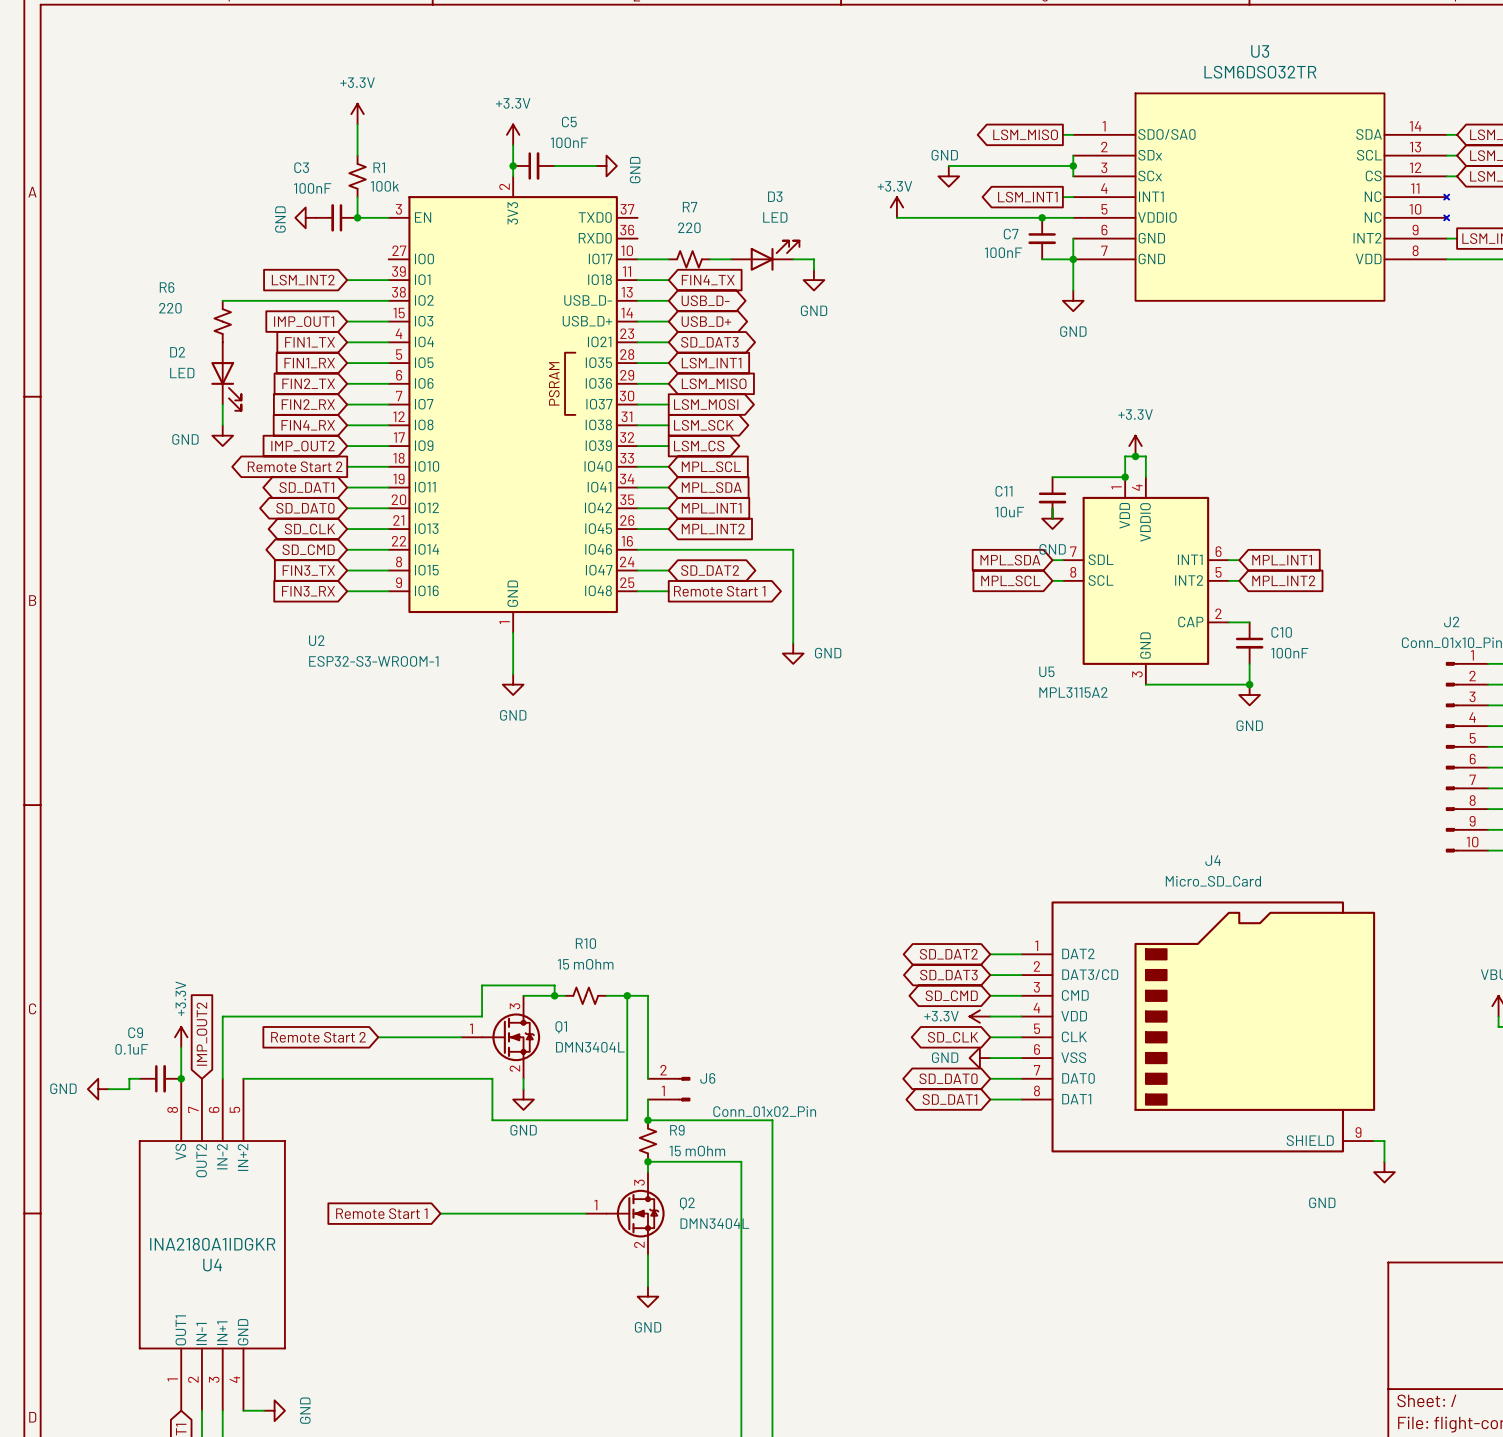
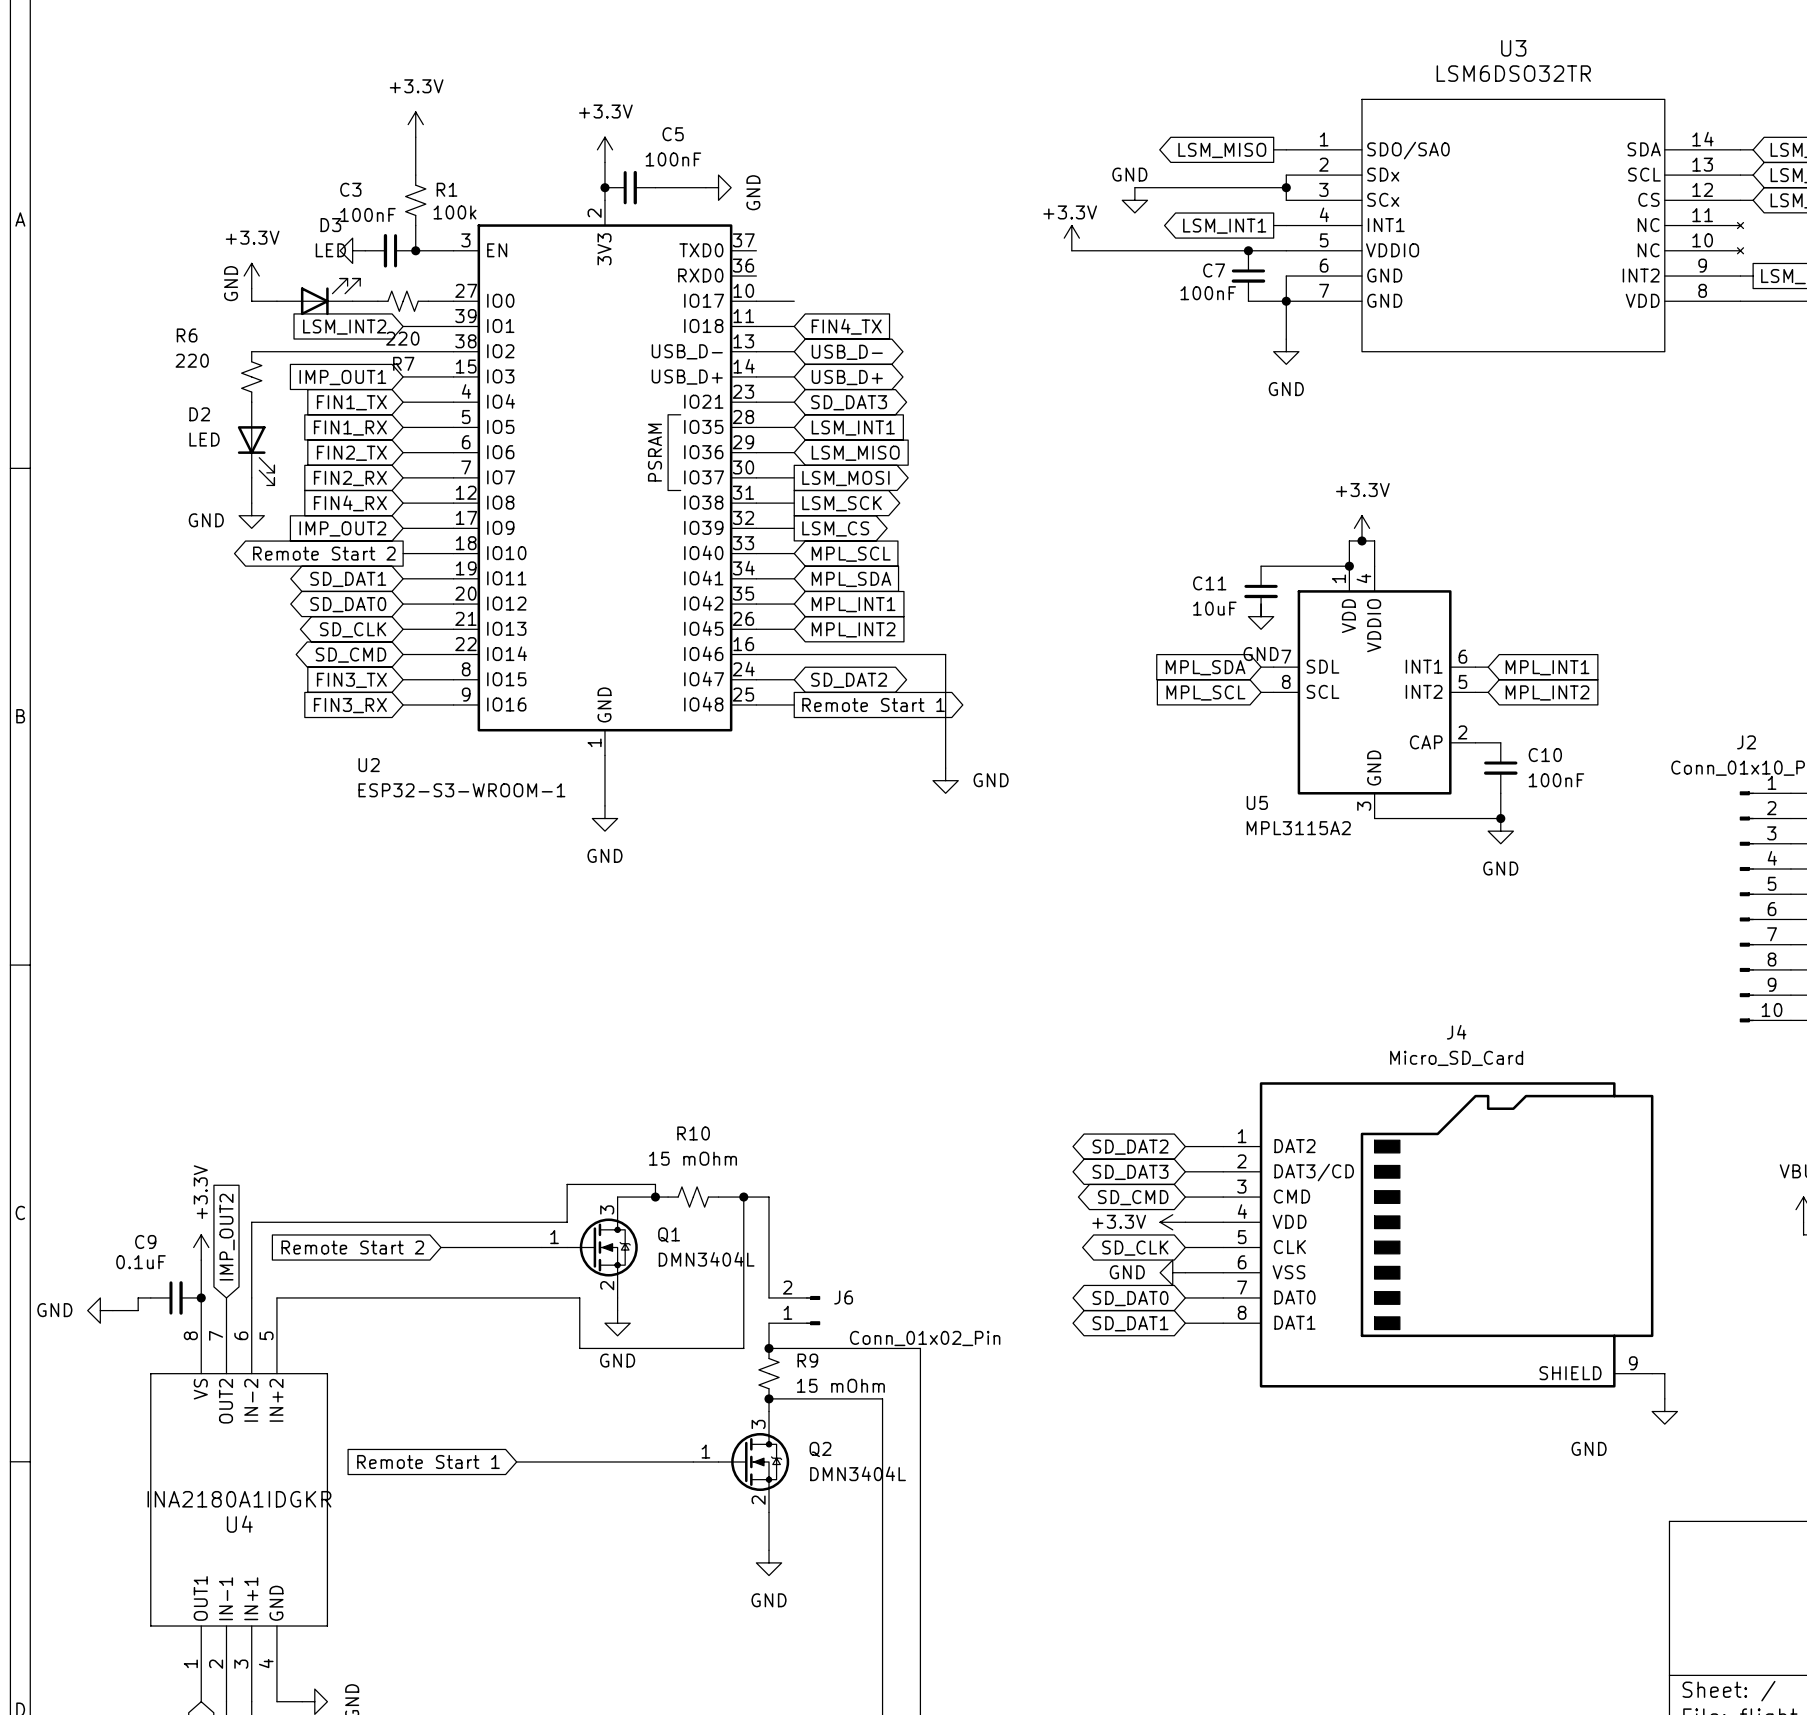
R7 name position: R7 (690, 207) -> R7 (403, 363)
power symbol text position: GND (280, 219) -> GND (231, 283)
R7 value position: 220 (689, 227) -> 220 (402, 338)
power symbol: none -> +3.3V (251, 276)
wire: none -> (251, 288) (251, 301) (276, 301)
D3 position: (765, 255) -> (318, 296)
wire: none -> (352, 301) (377, 301)
wire: none -> (428, 301) (453, 301)
R7 position: (689, 259) -> (403, 301)
wire: (710, 259) (730, 259) -> none
wire: (793, 259) (813, 259) (813, 269) -> none
power symbol: GND (813, 280) -> none

